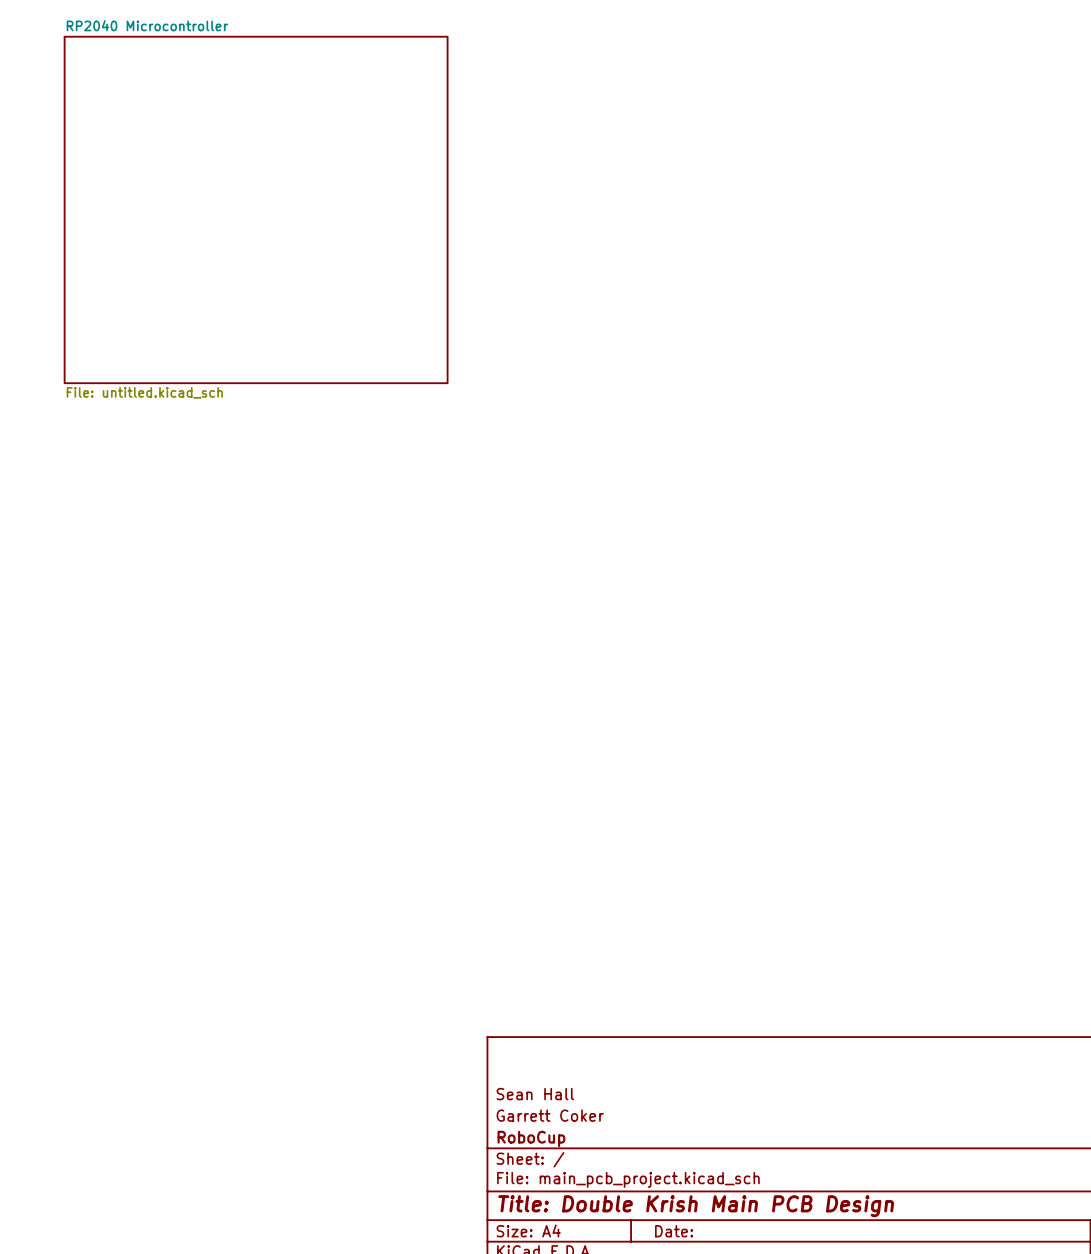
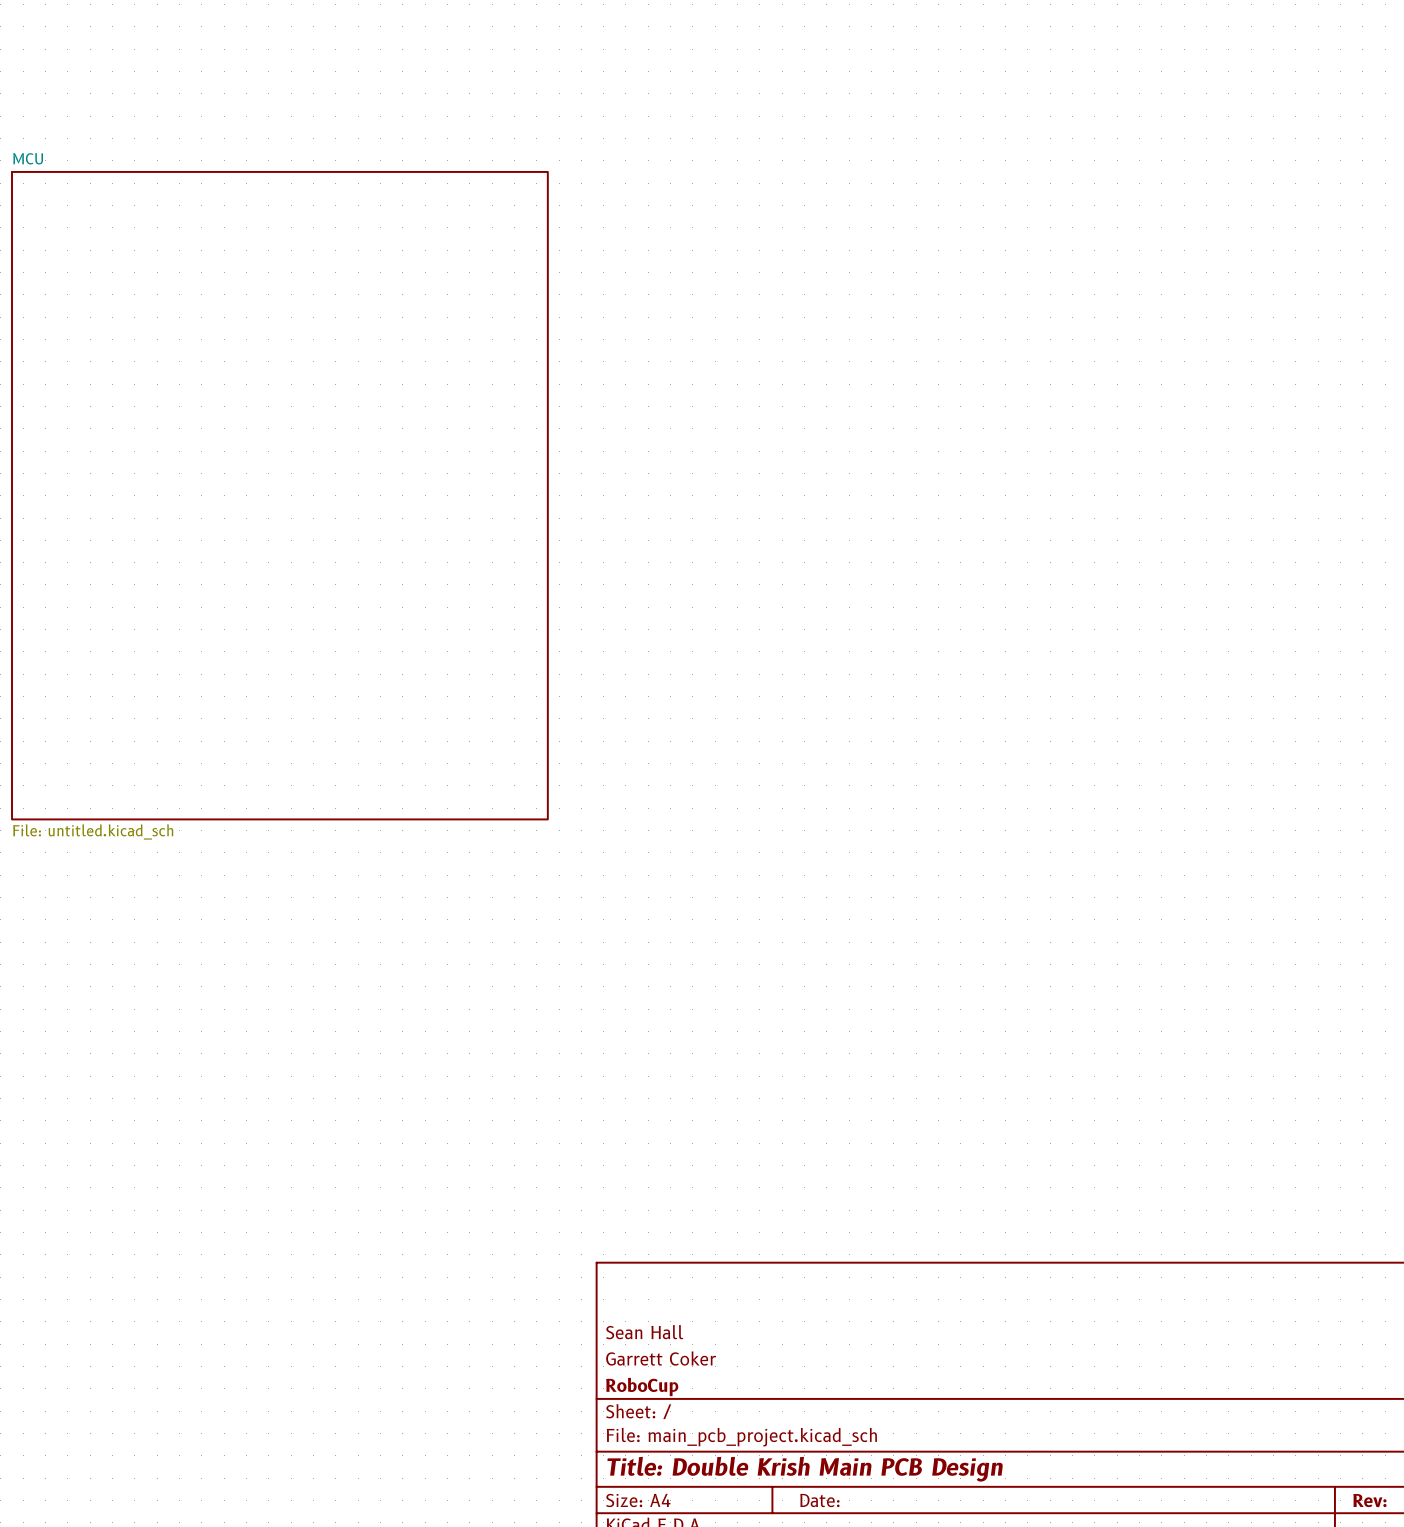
sheet RP2040 Microcontroller: File: untitled.kicad_sch (256, 209) -> none
sheet MCU: none -> File: untitled.kicad_sch (279, 495)

